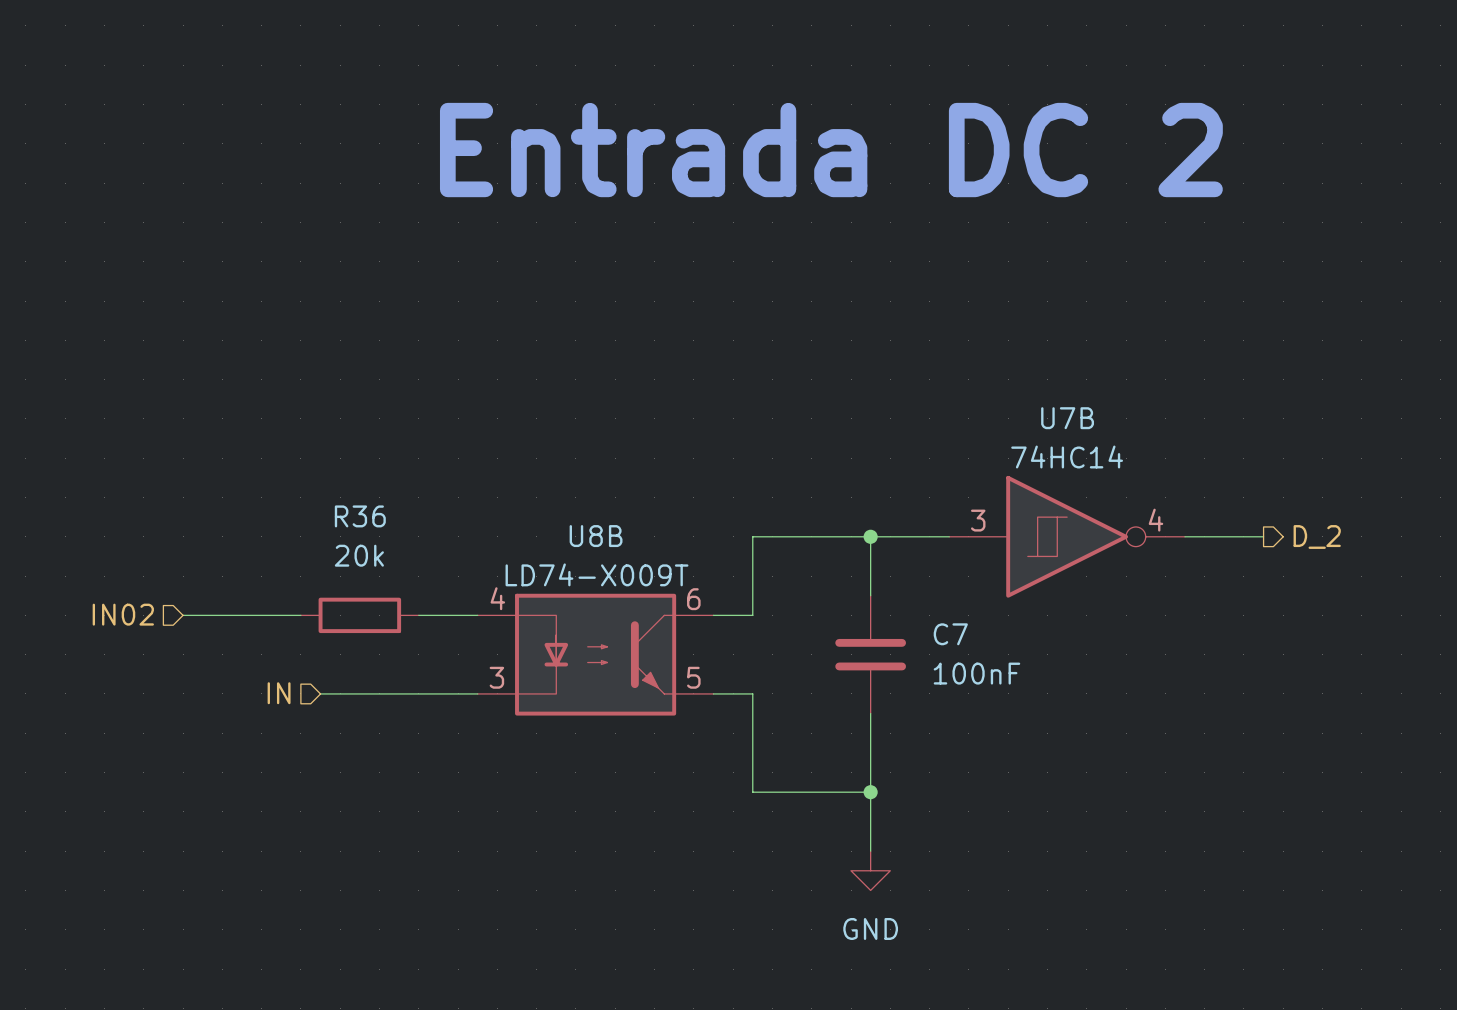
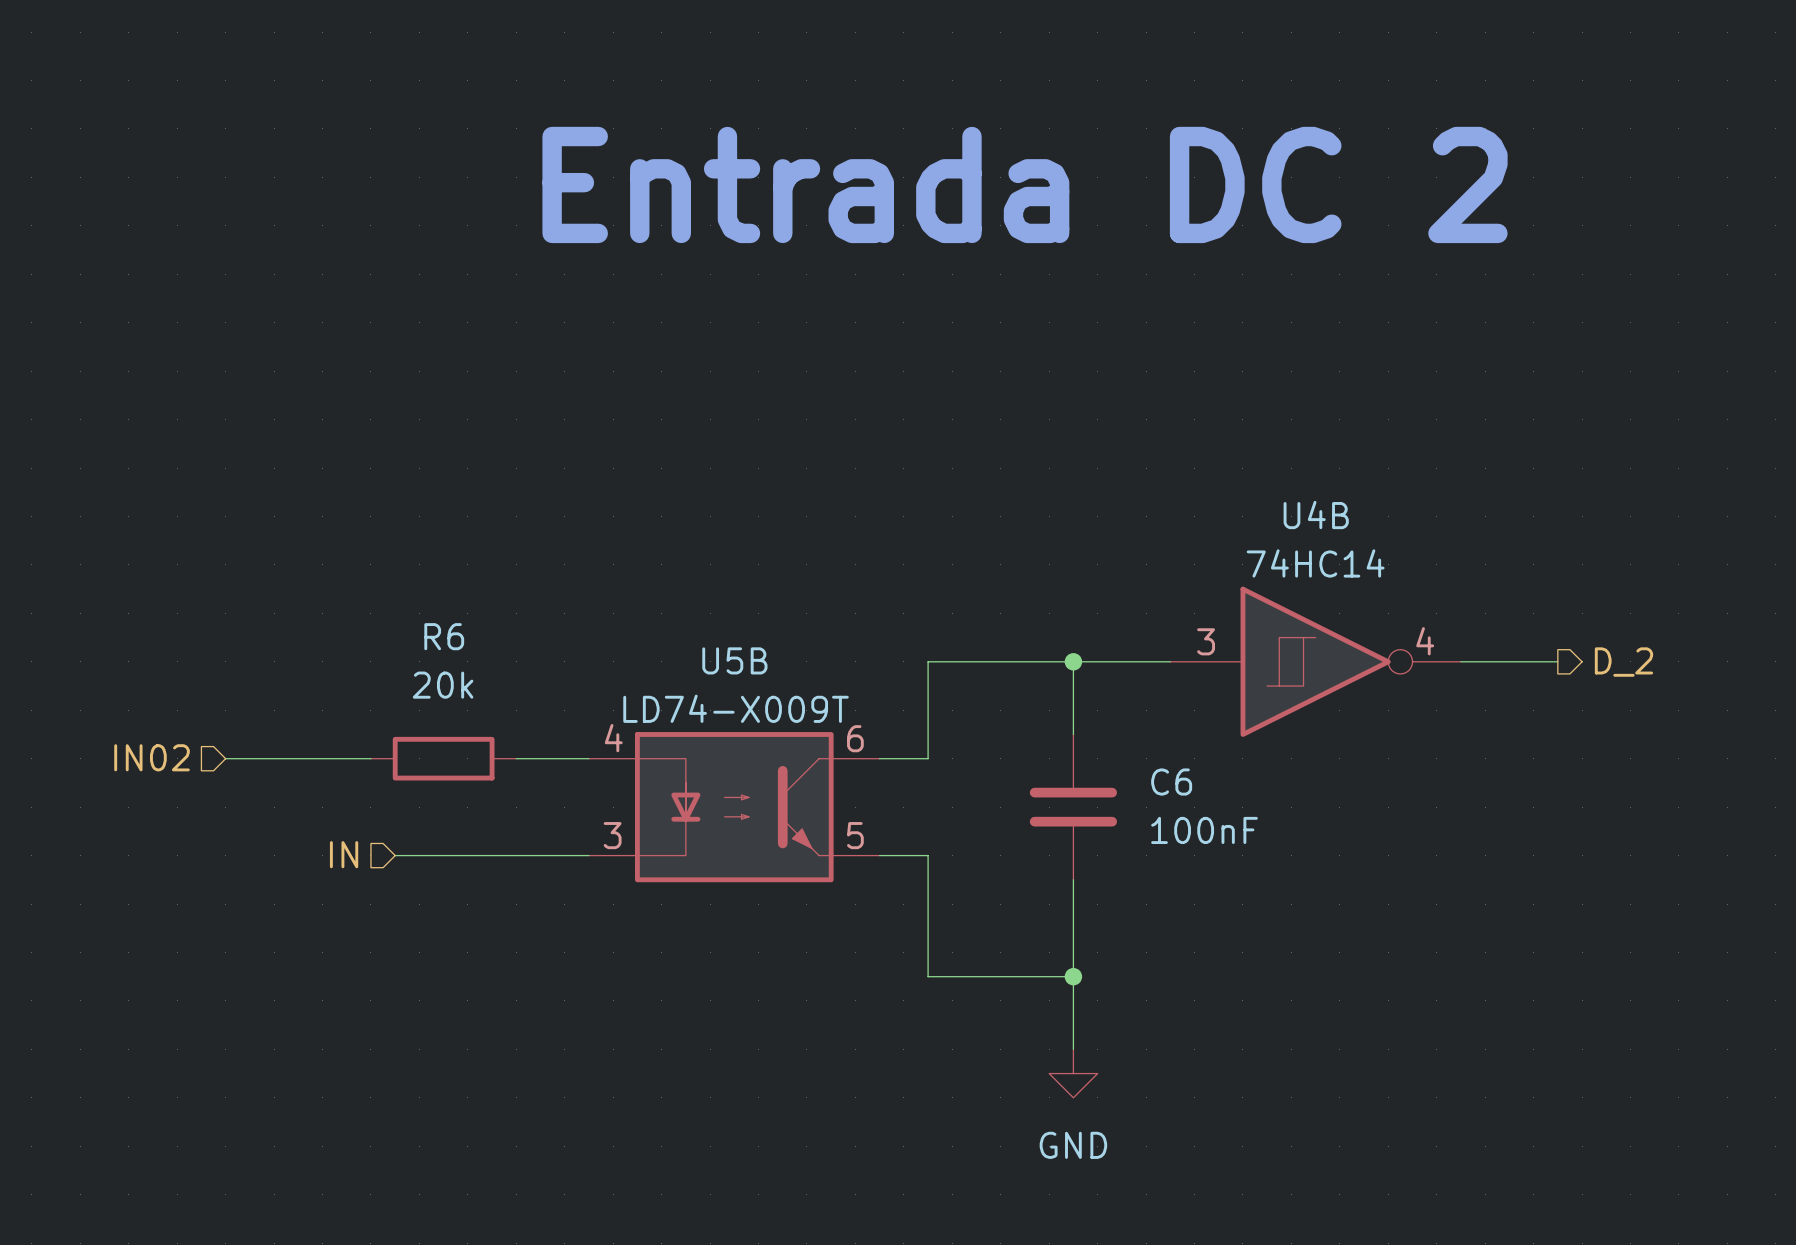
U7B name: U7B (1067, 418) -> U4B (1316, 514)
R36 name: R36 (360, 516) -> R6 (444, 636)
U8B name: U8B (596, 536) -> U5B (734, 660)
C7 name: C7 (950, 634) -> C6 (1171, 782)

